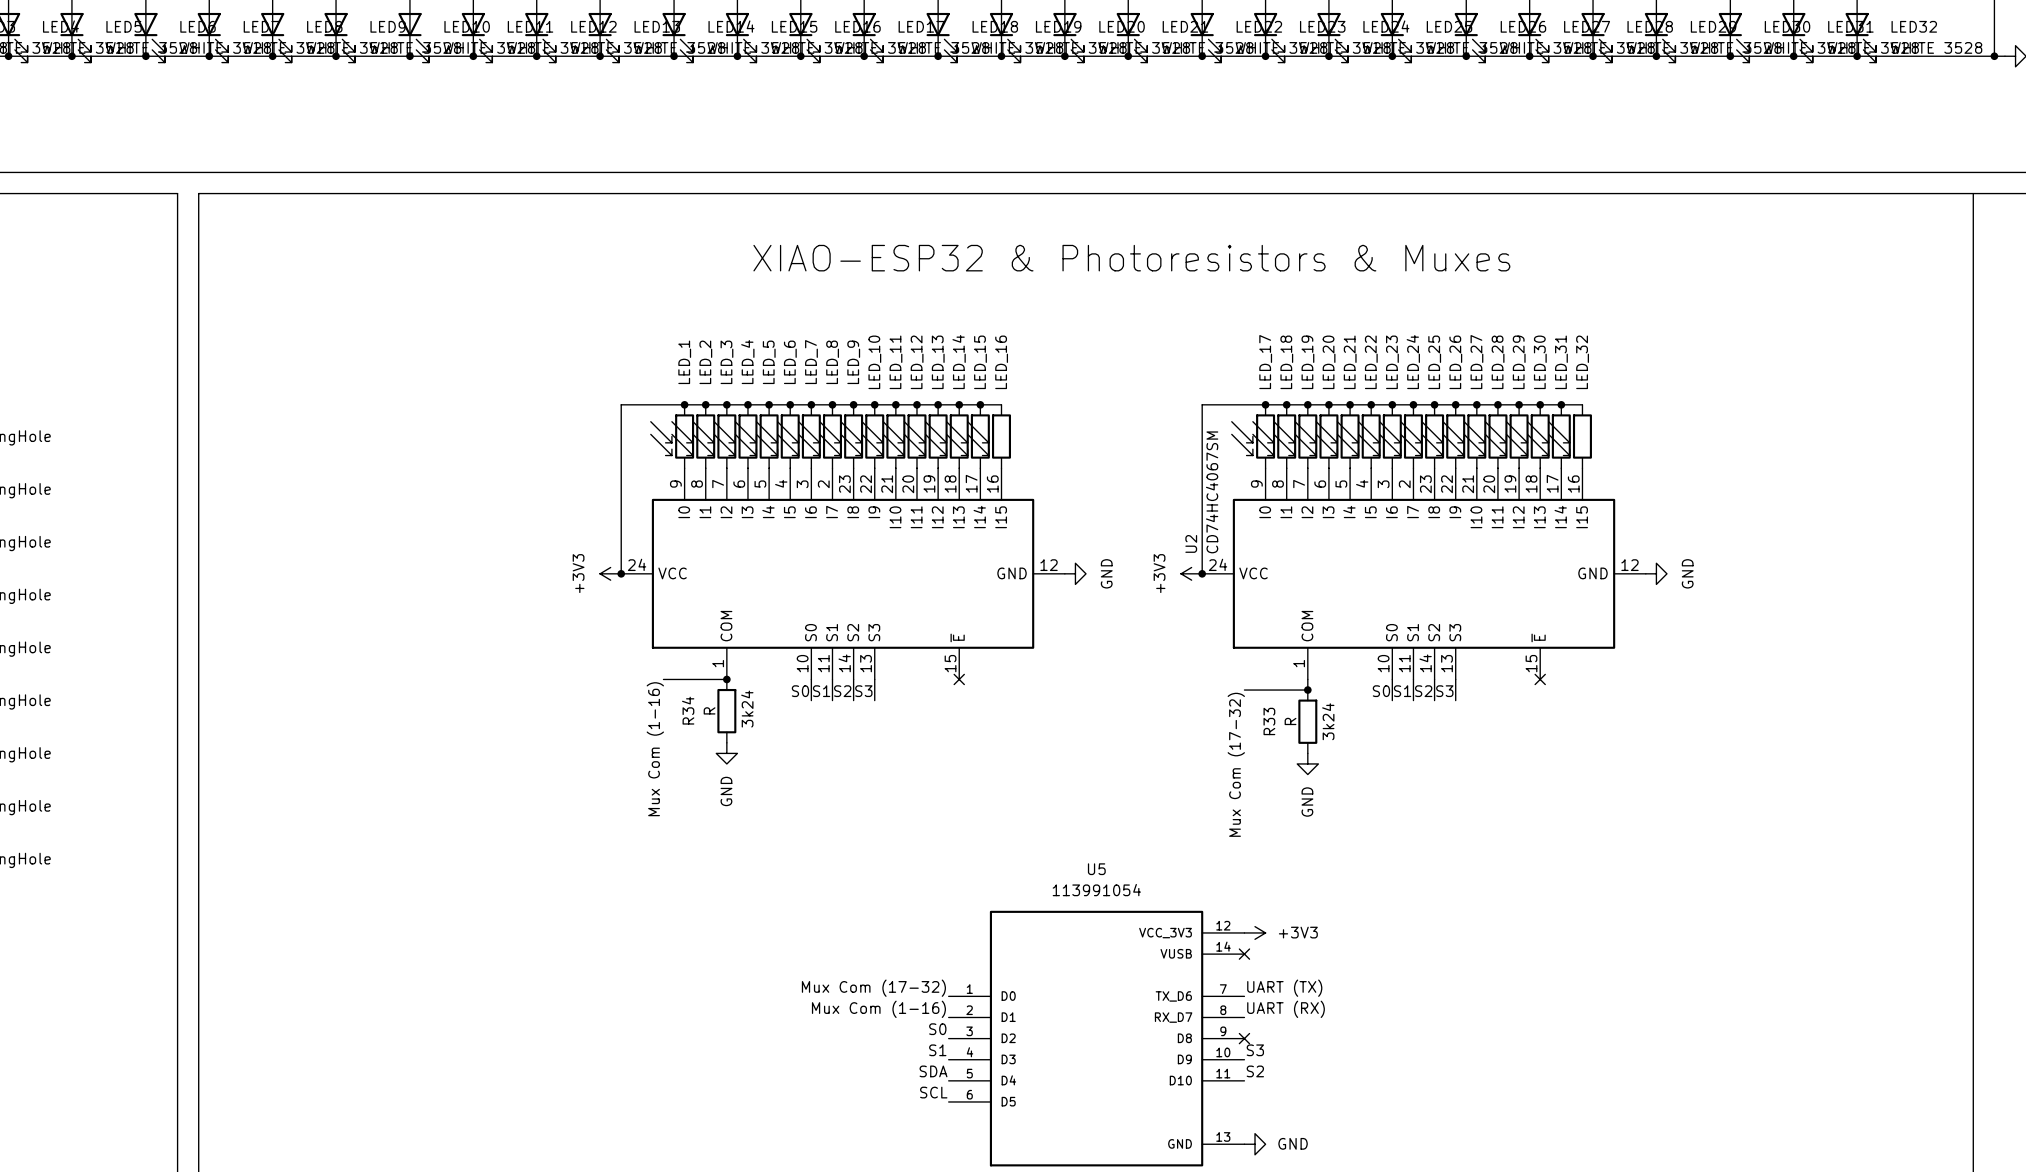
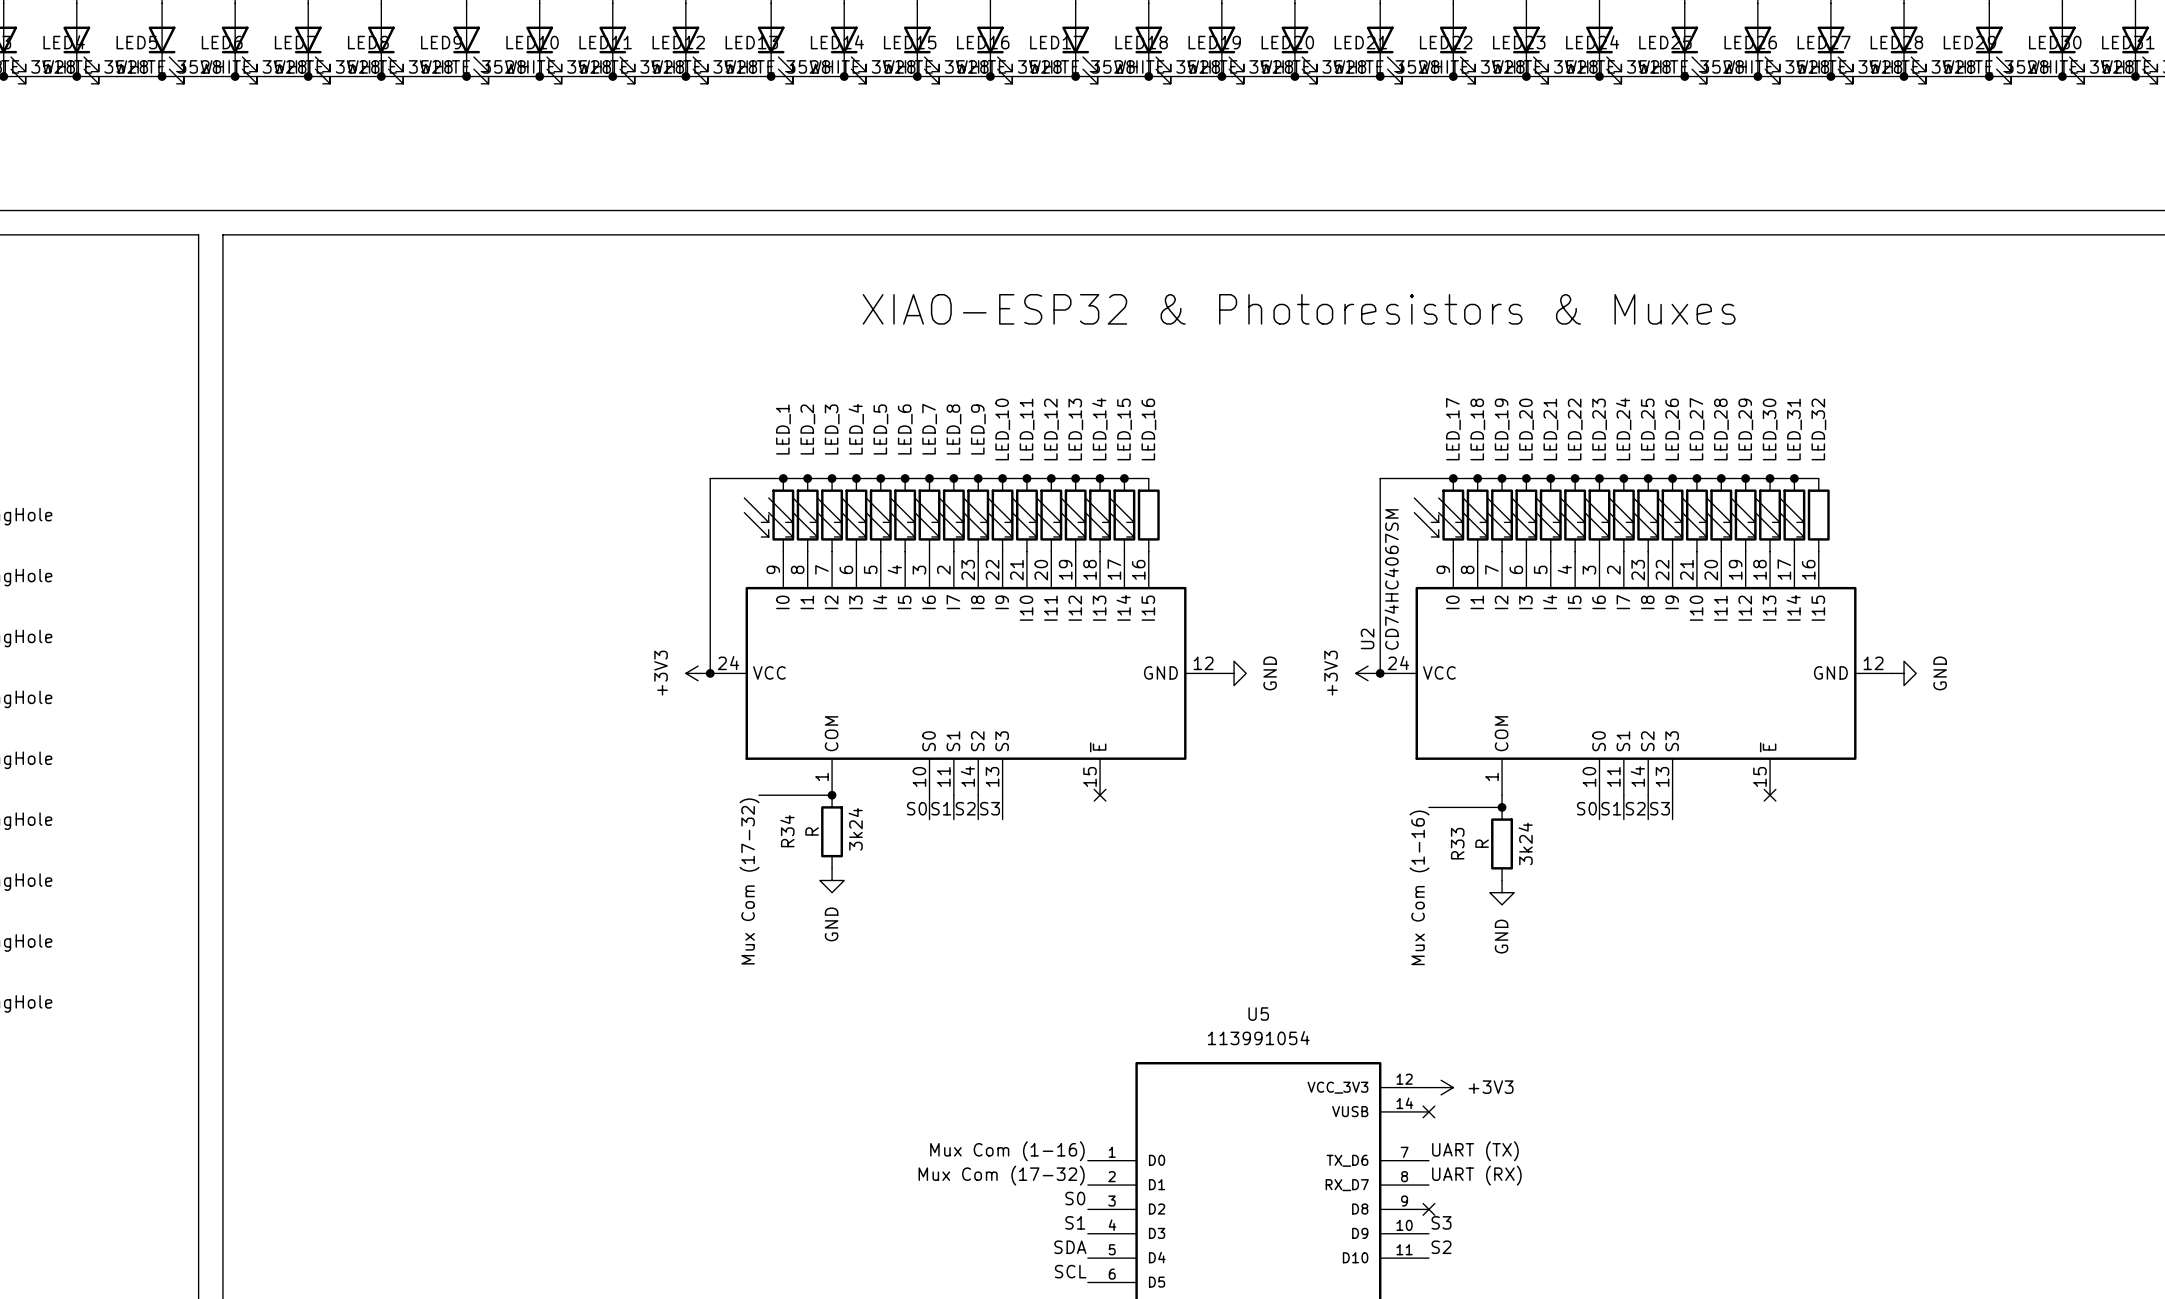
label: Mux Com (1-16) (655, 749) -> Mux Com (17-32) (749, 881)
label: Mux Com (17-32) (1236, 764) -> Mux Com (1-16) (1419, 887)
label: Mux Com (17-32) (873, 988) -> Mux Com (1-16) (1007, 1151)
label: Mux Com (1-16) (878, 1009) -> Mux Com (17-32) (1001, 1175)

